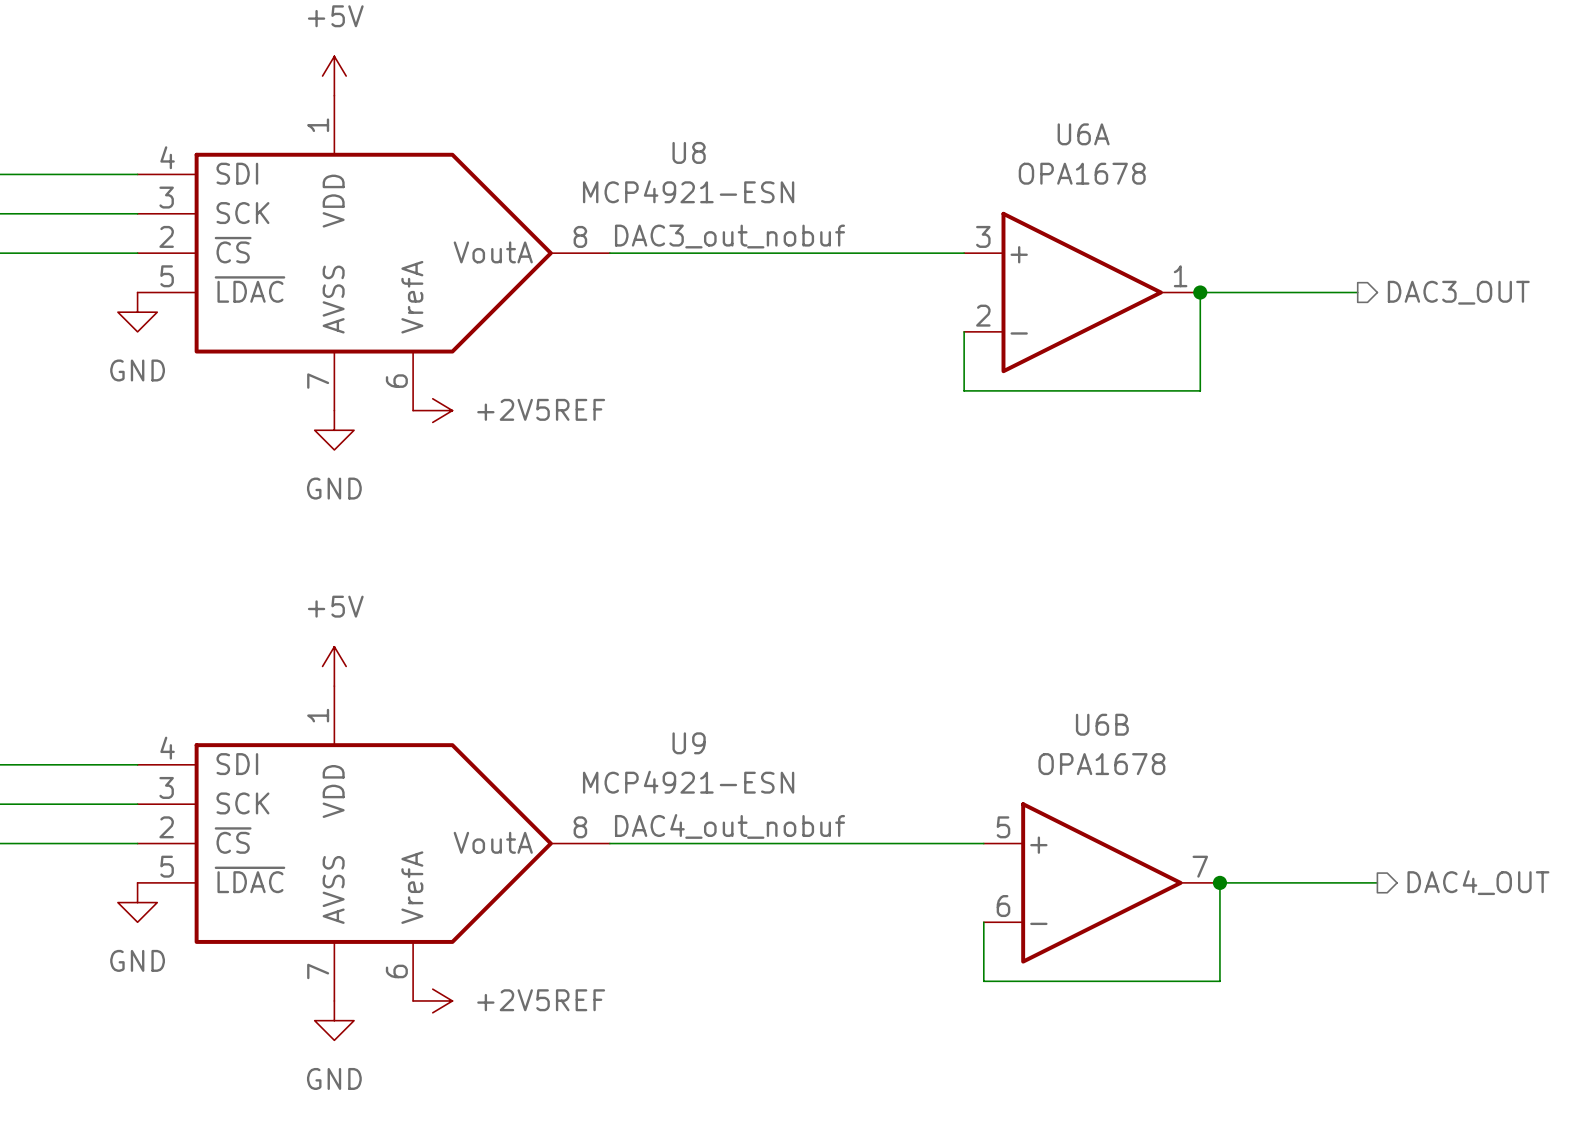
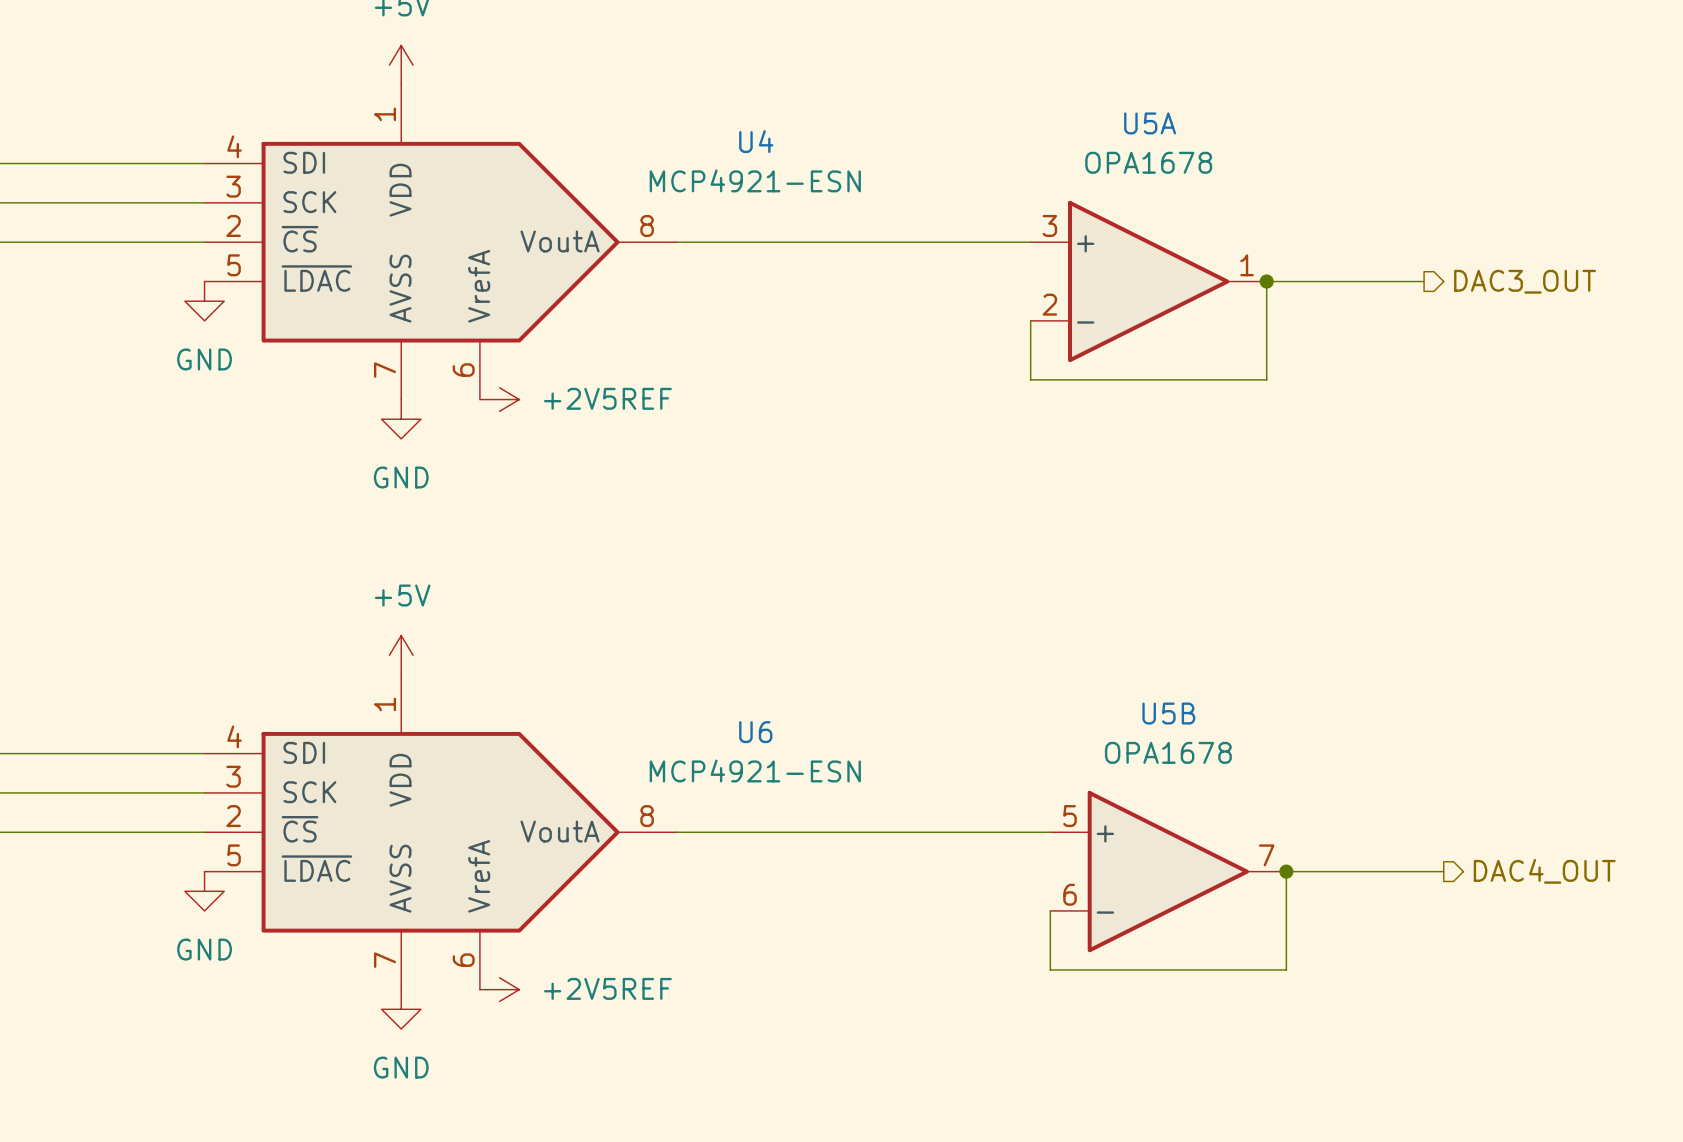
U6A name: U6A (1083, 134) -> U5A (1150, 123)
U8 name: U8 (689, 152) -> U4 (756, 141)
label: DAC3_out_nobuf (729, 236) -> none
U6B name: U6B (1102, 724) -> U5B (1168, 713)
U9 name: U9 (689, 743) -> U6 (755, 732)
label: DAC4_out_nobuf (729, 826) -> none

